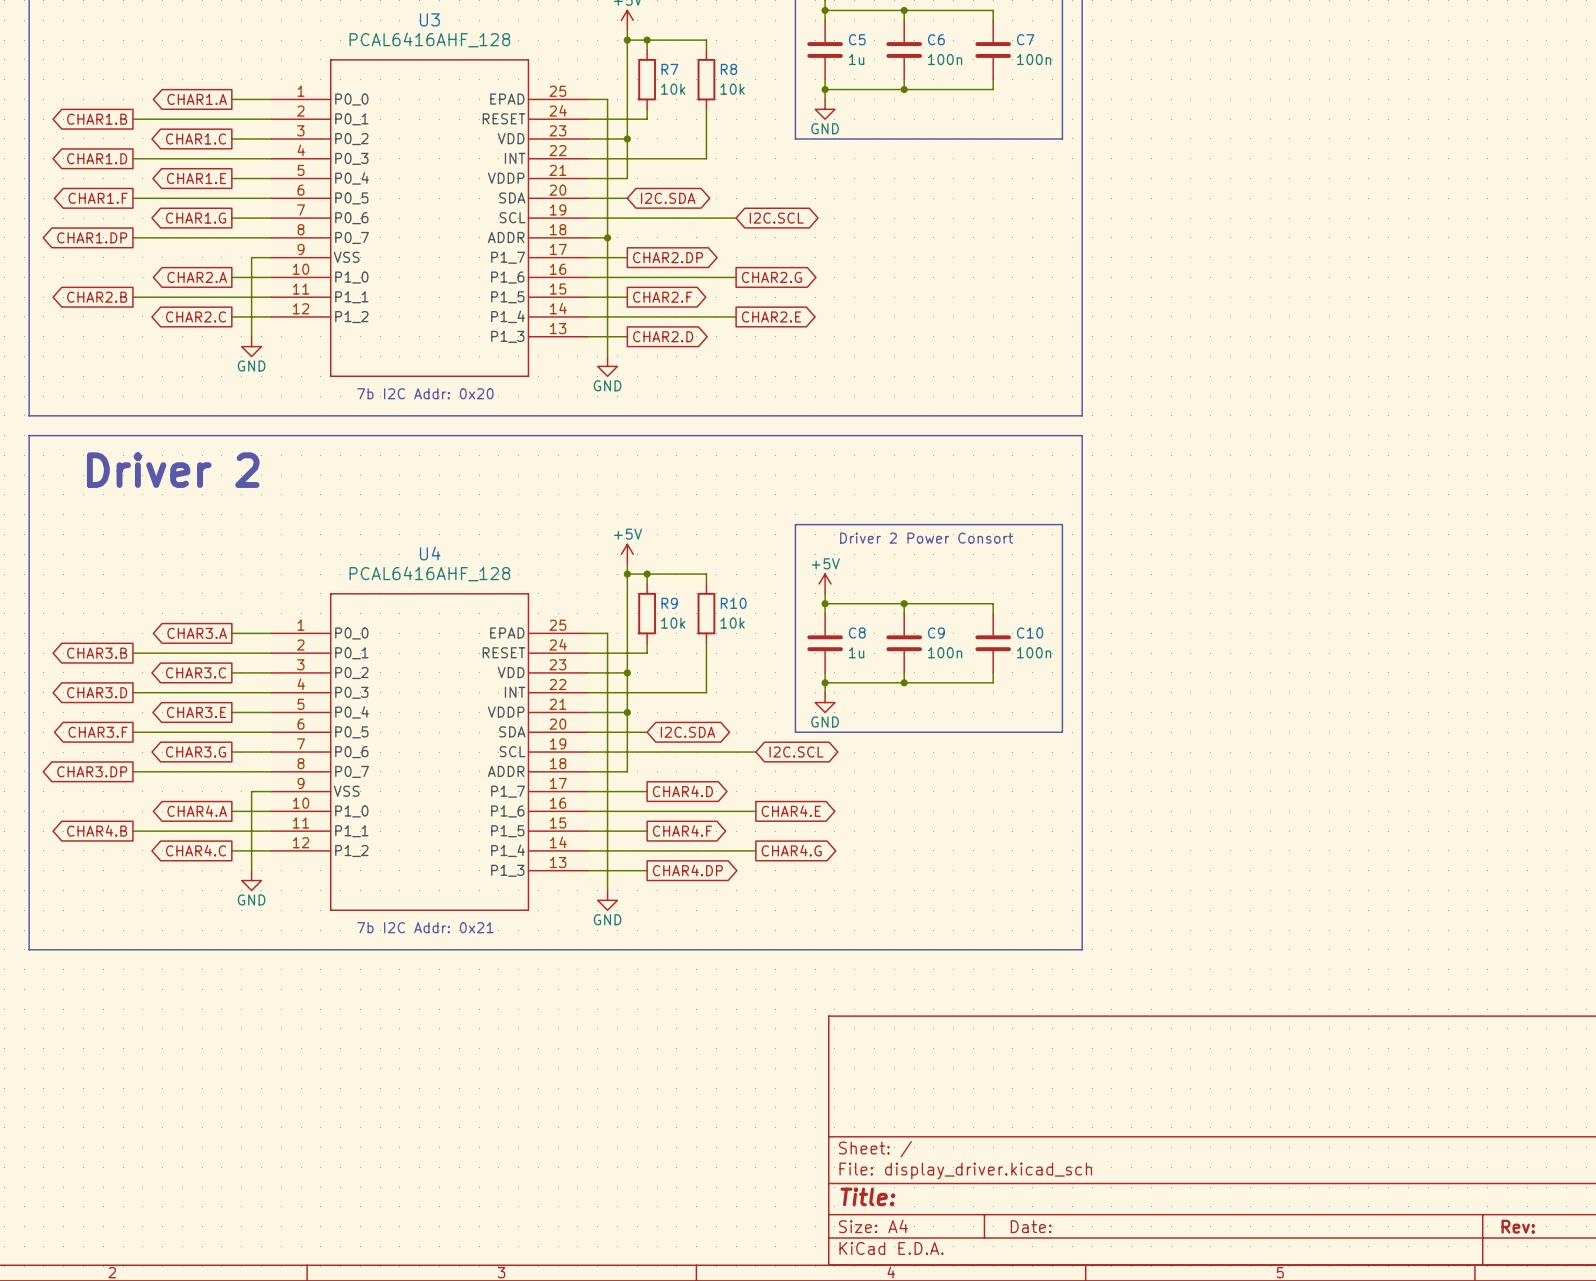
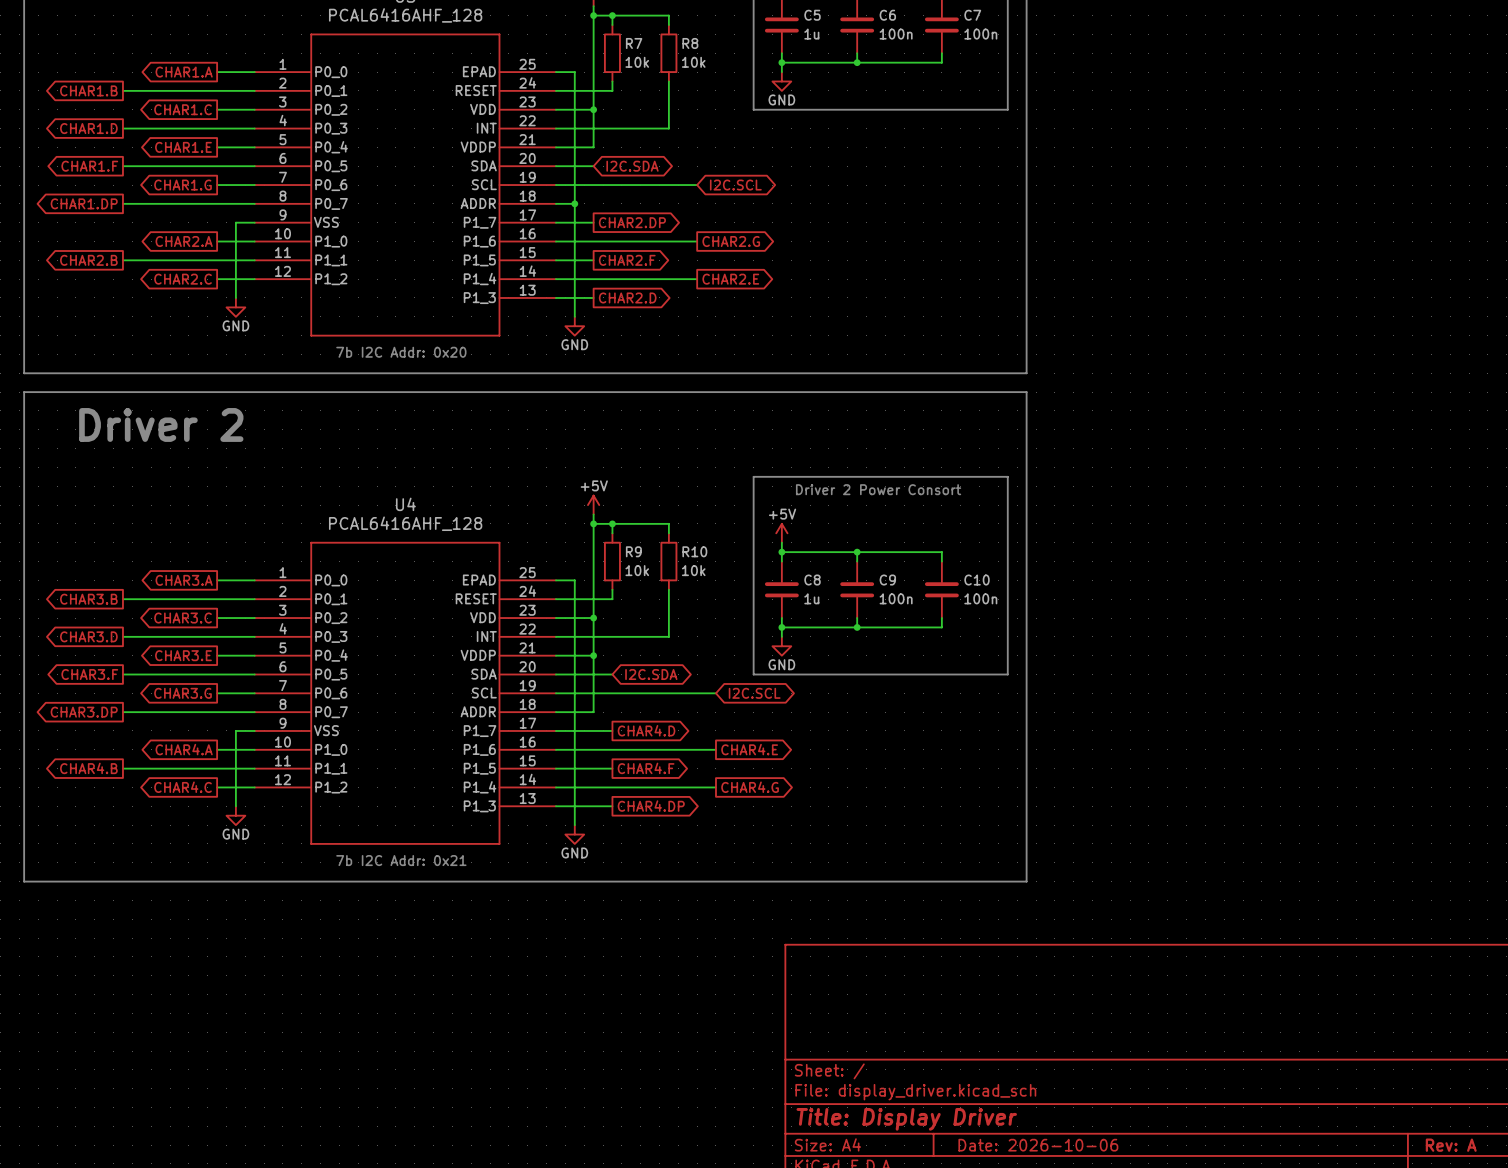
title block: Title: (867, 1196) -> Title: Display Driver (906, 1119)
title block: Date: (1031, 1226) -> Date: 2026-10-06 (1038, 1145)
title block: Rev: (1518, 1226) -> Rev: A (1451, 1145)

